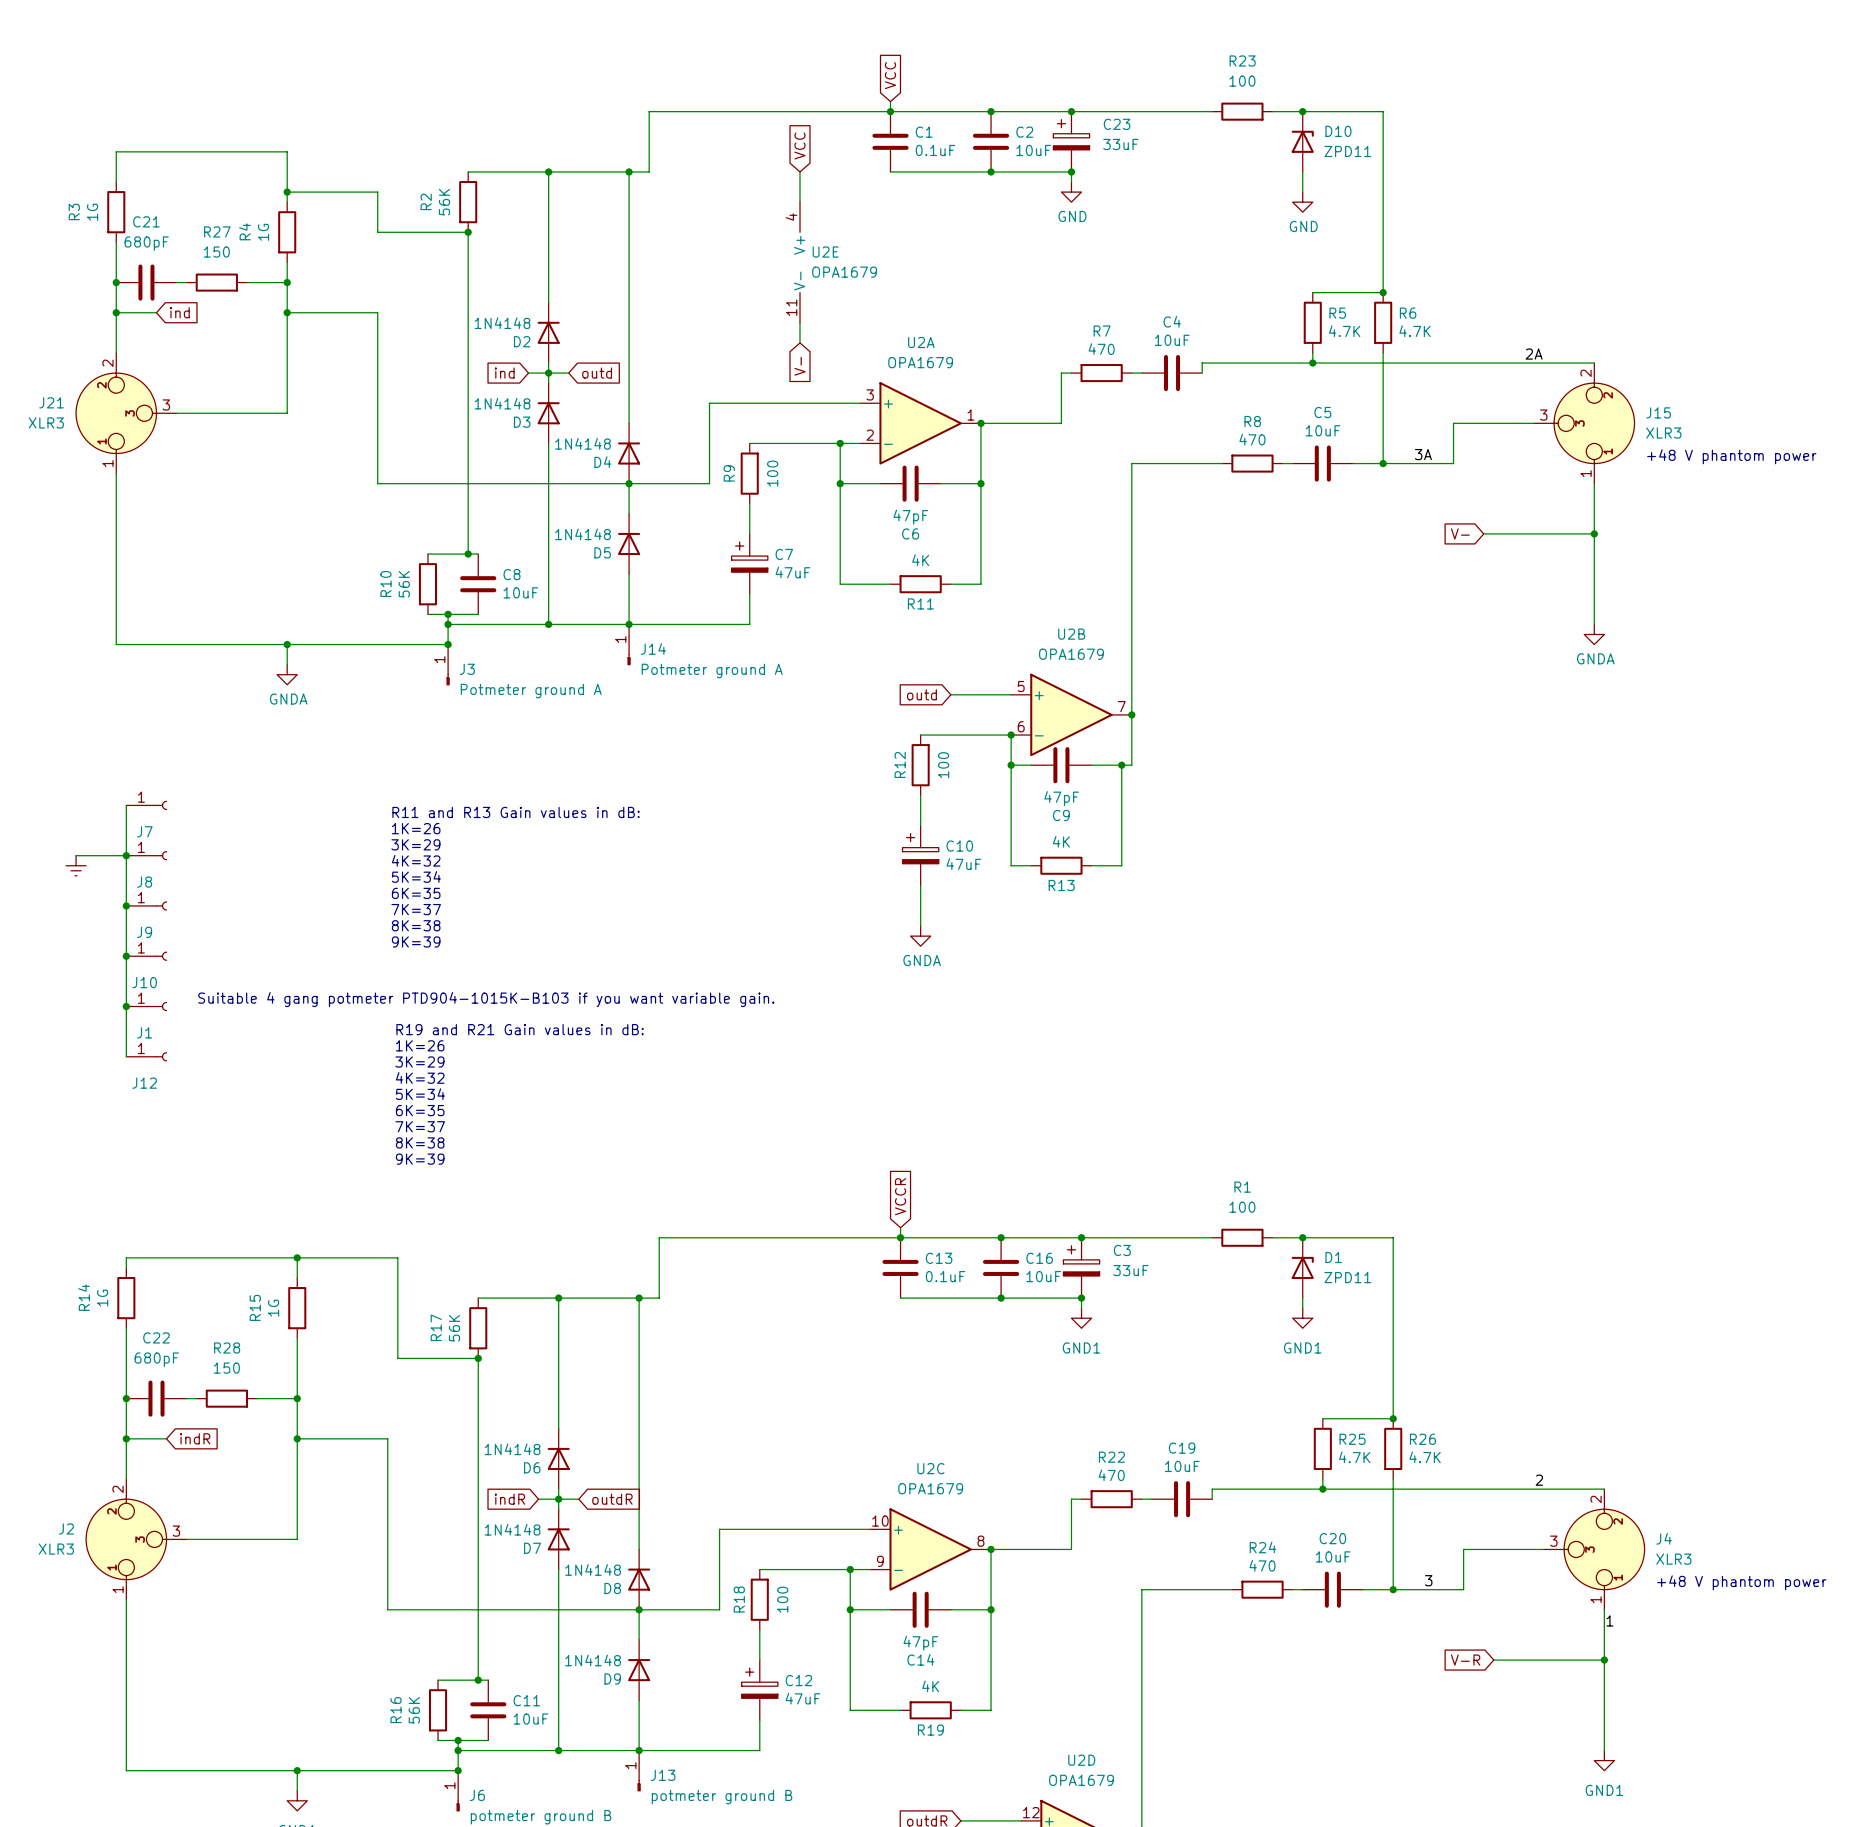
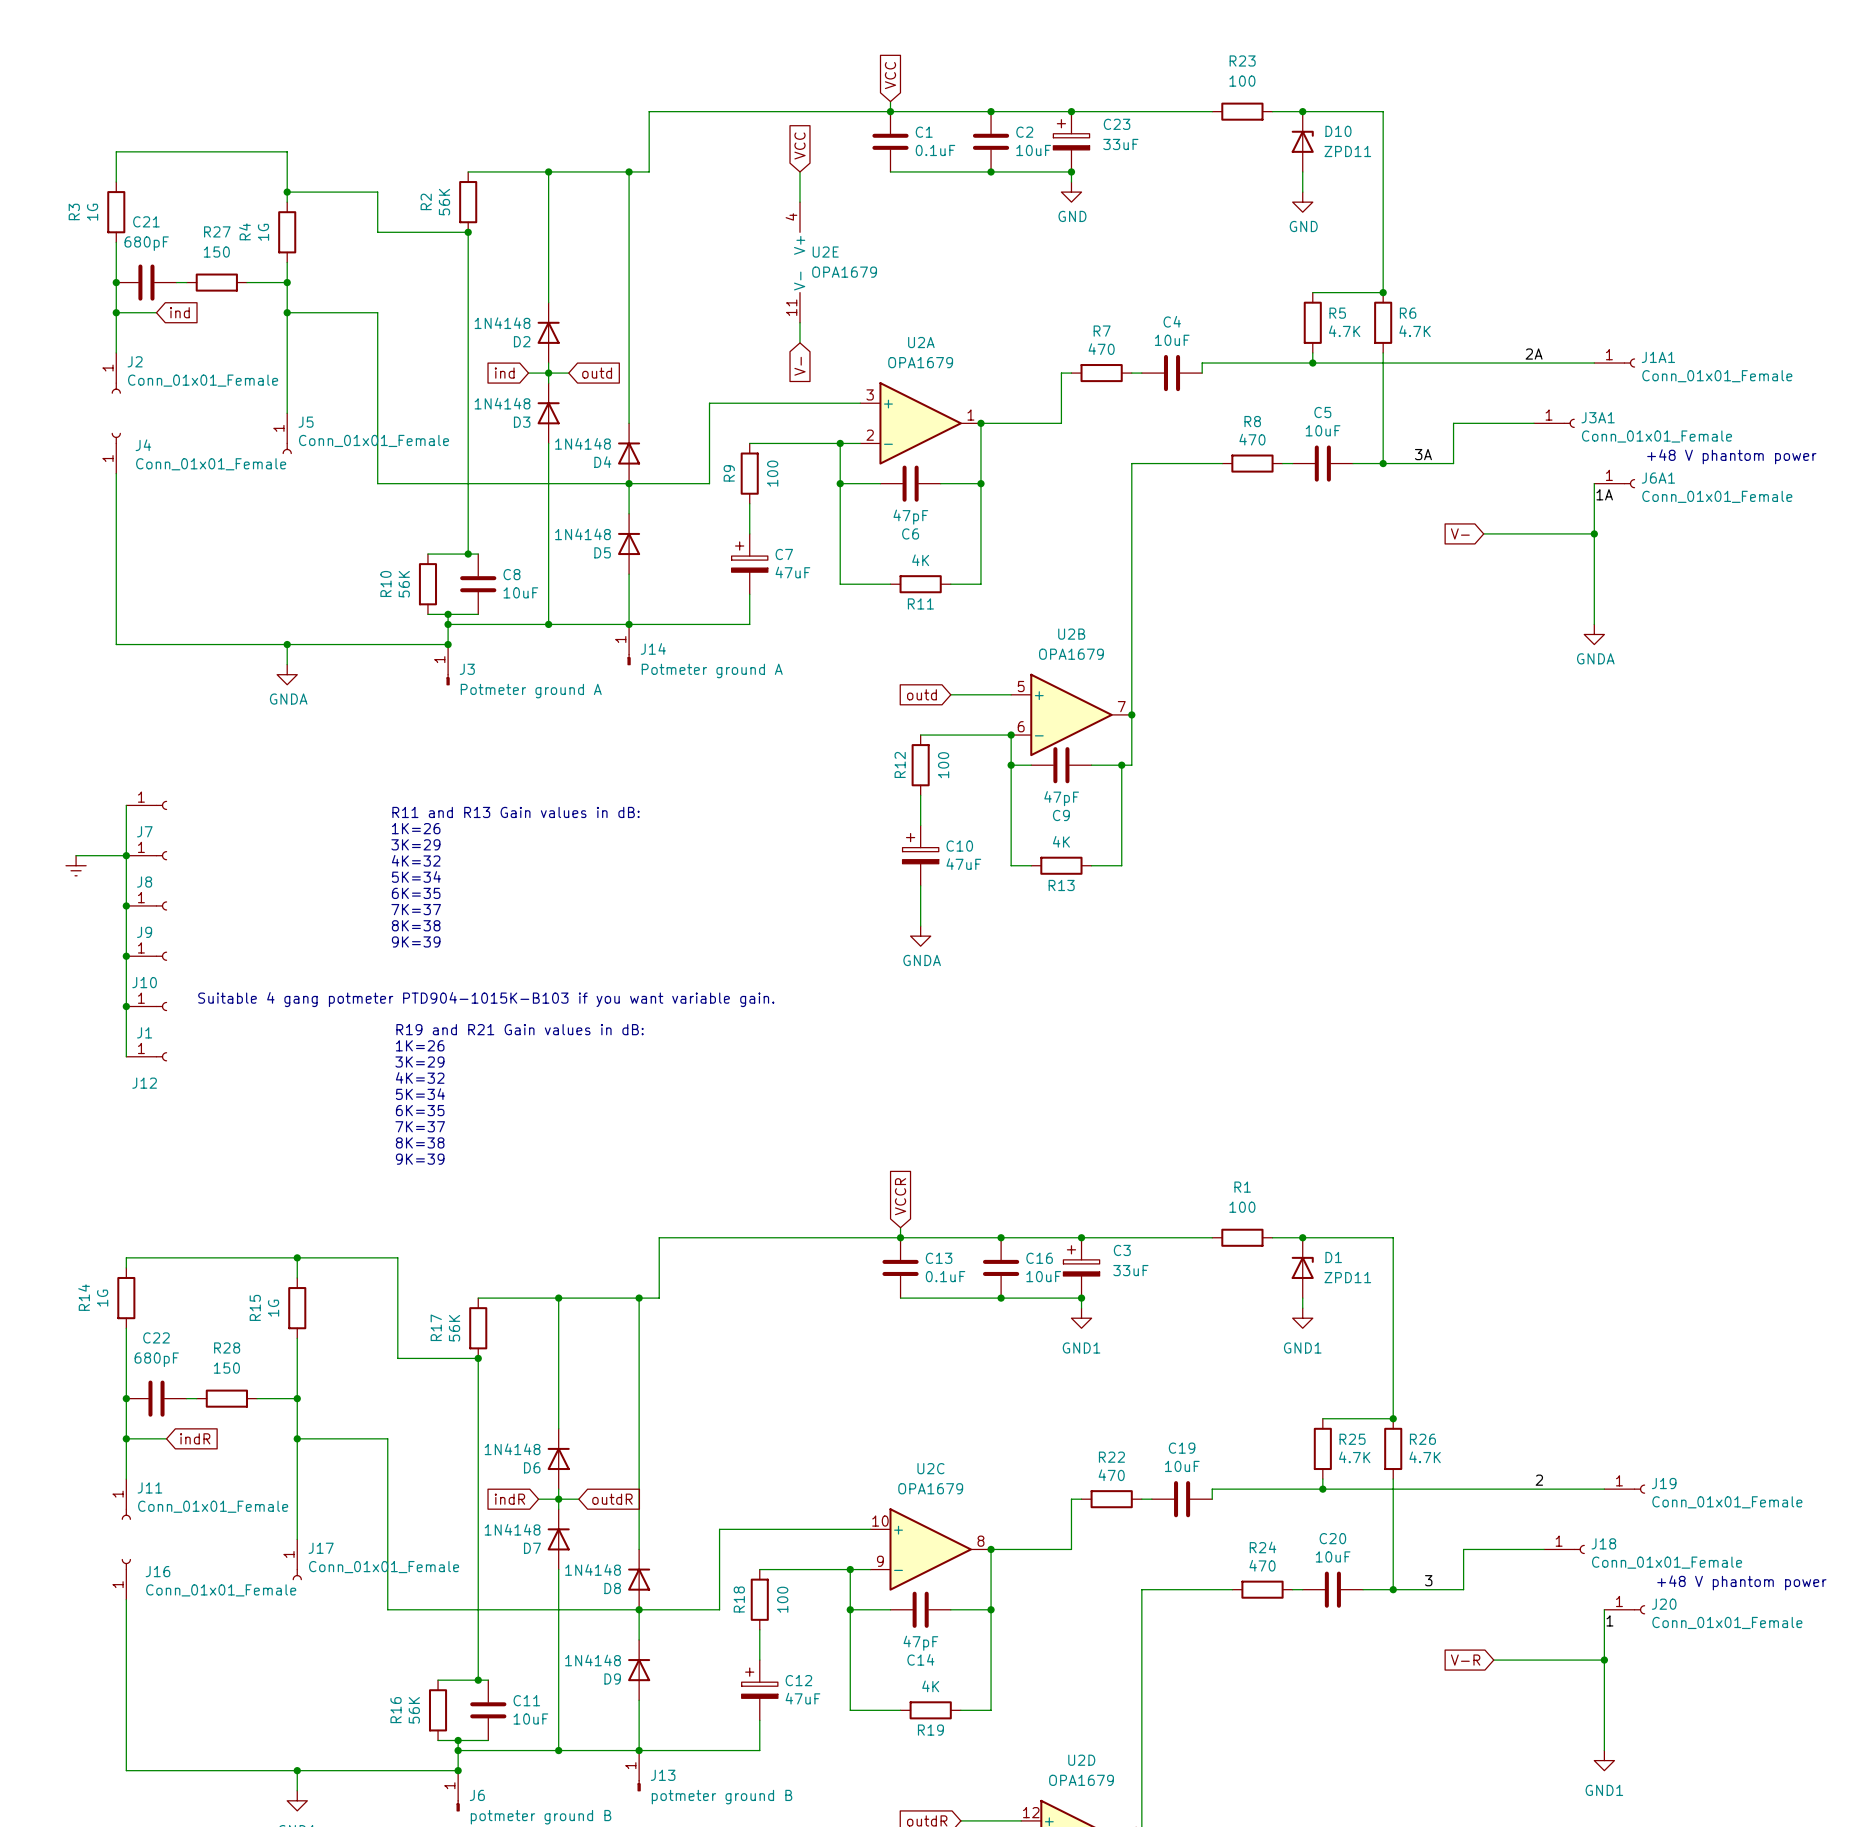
J1A1: none -> Conn_01x01_Female (1614, 363)
J21: XLR3 (126, 413) -> none
wire: (176, 413) (287, 413) -> none
J3A1: none -> Conn_01x01_Female (1554, 423)
J15: XLR3 (1584, 423) -> none
J5: none -> Conn_01x01_Female (287, 433)
J6A1: none -> Conn_01x01_Female (1614, 483)
label: none -> 1A (1604, 494)
J2 symbol: [86, 1479, 187, 1600] -> [111, 352, 121, 394]
J4 symbol: [1544, 1489, 1645, 1610] -> [111, 432, 121, 474]
J19: none -> Conn_01x01_Female (1624, 1489)
J11: none -> Conn_01x01_Female (126, 1499)
J2 name position: J2 (66, 1528) -> J2 (135, 361)
J4 name position: J4 (1664, 1538) -> J4 (143, 445)
wire: (186, 1539) (297, 1539) -> none
J2 value: XLR3 (56, 1549) -> Conn_01x01_Female (203, 380)
J18: none -> Conn_01x01_Female (1564, 1549)
J17: none -> Conn_01x01_Female (297, 1559)
J4 value: XLR3 (1673, 1559) -> Conn_01x01_Female (211, 464)
J16: none -> Conn_01x01_Female (126, 1579)
J20: none -> Conn_01x01_Female (1624, 1609)

